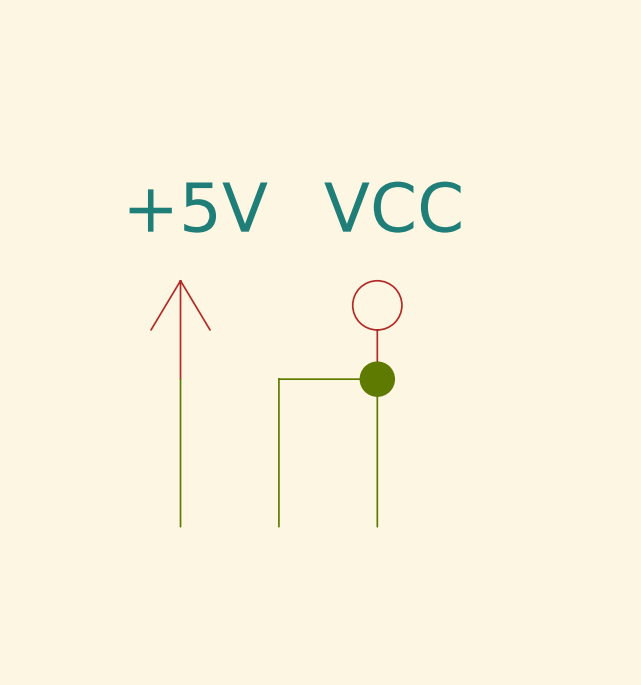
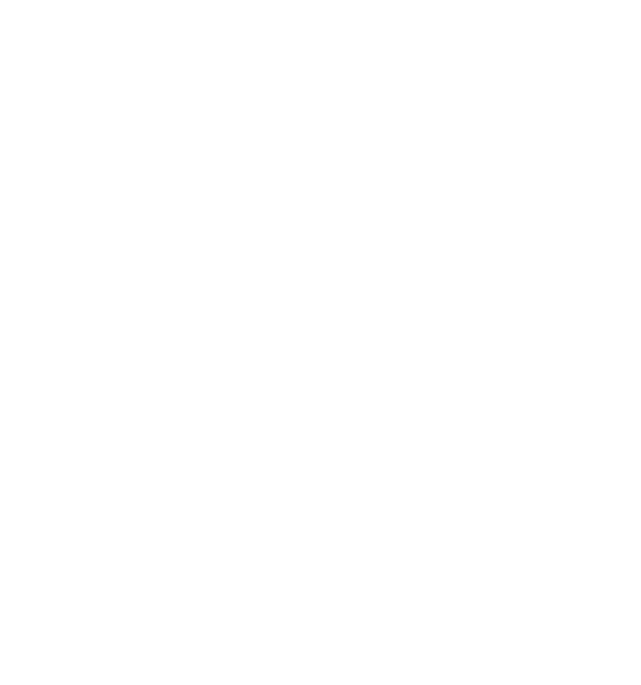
power symbol: +5V (180, 329) -> none
power symbol: VCC (377, 329) -> none
wire: (180, 379) (180, 526) -> none
junction: (377, 379) -> none
wire: (278, 526) (278, 379) (377, 379) (377, 526) -> none

